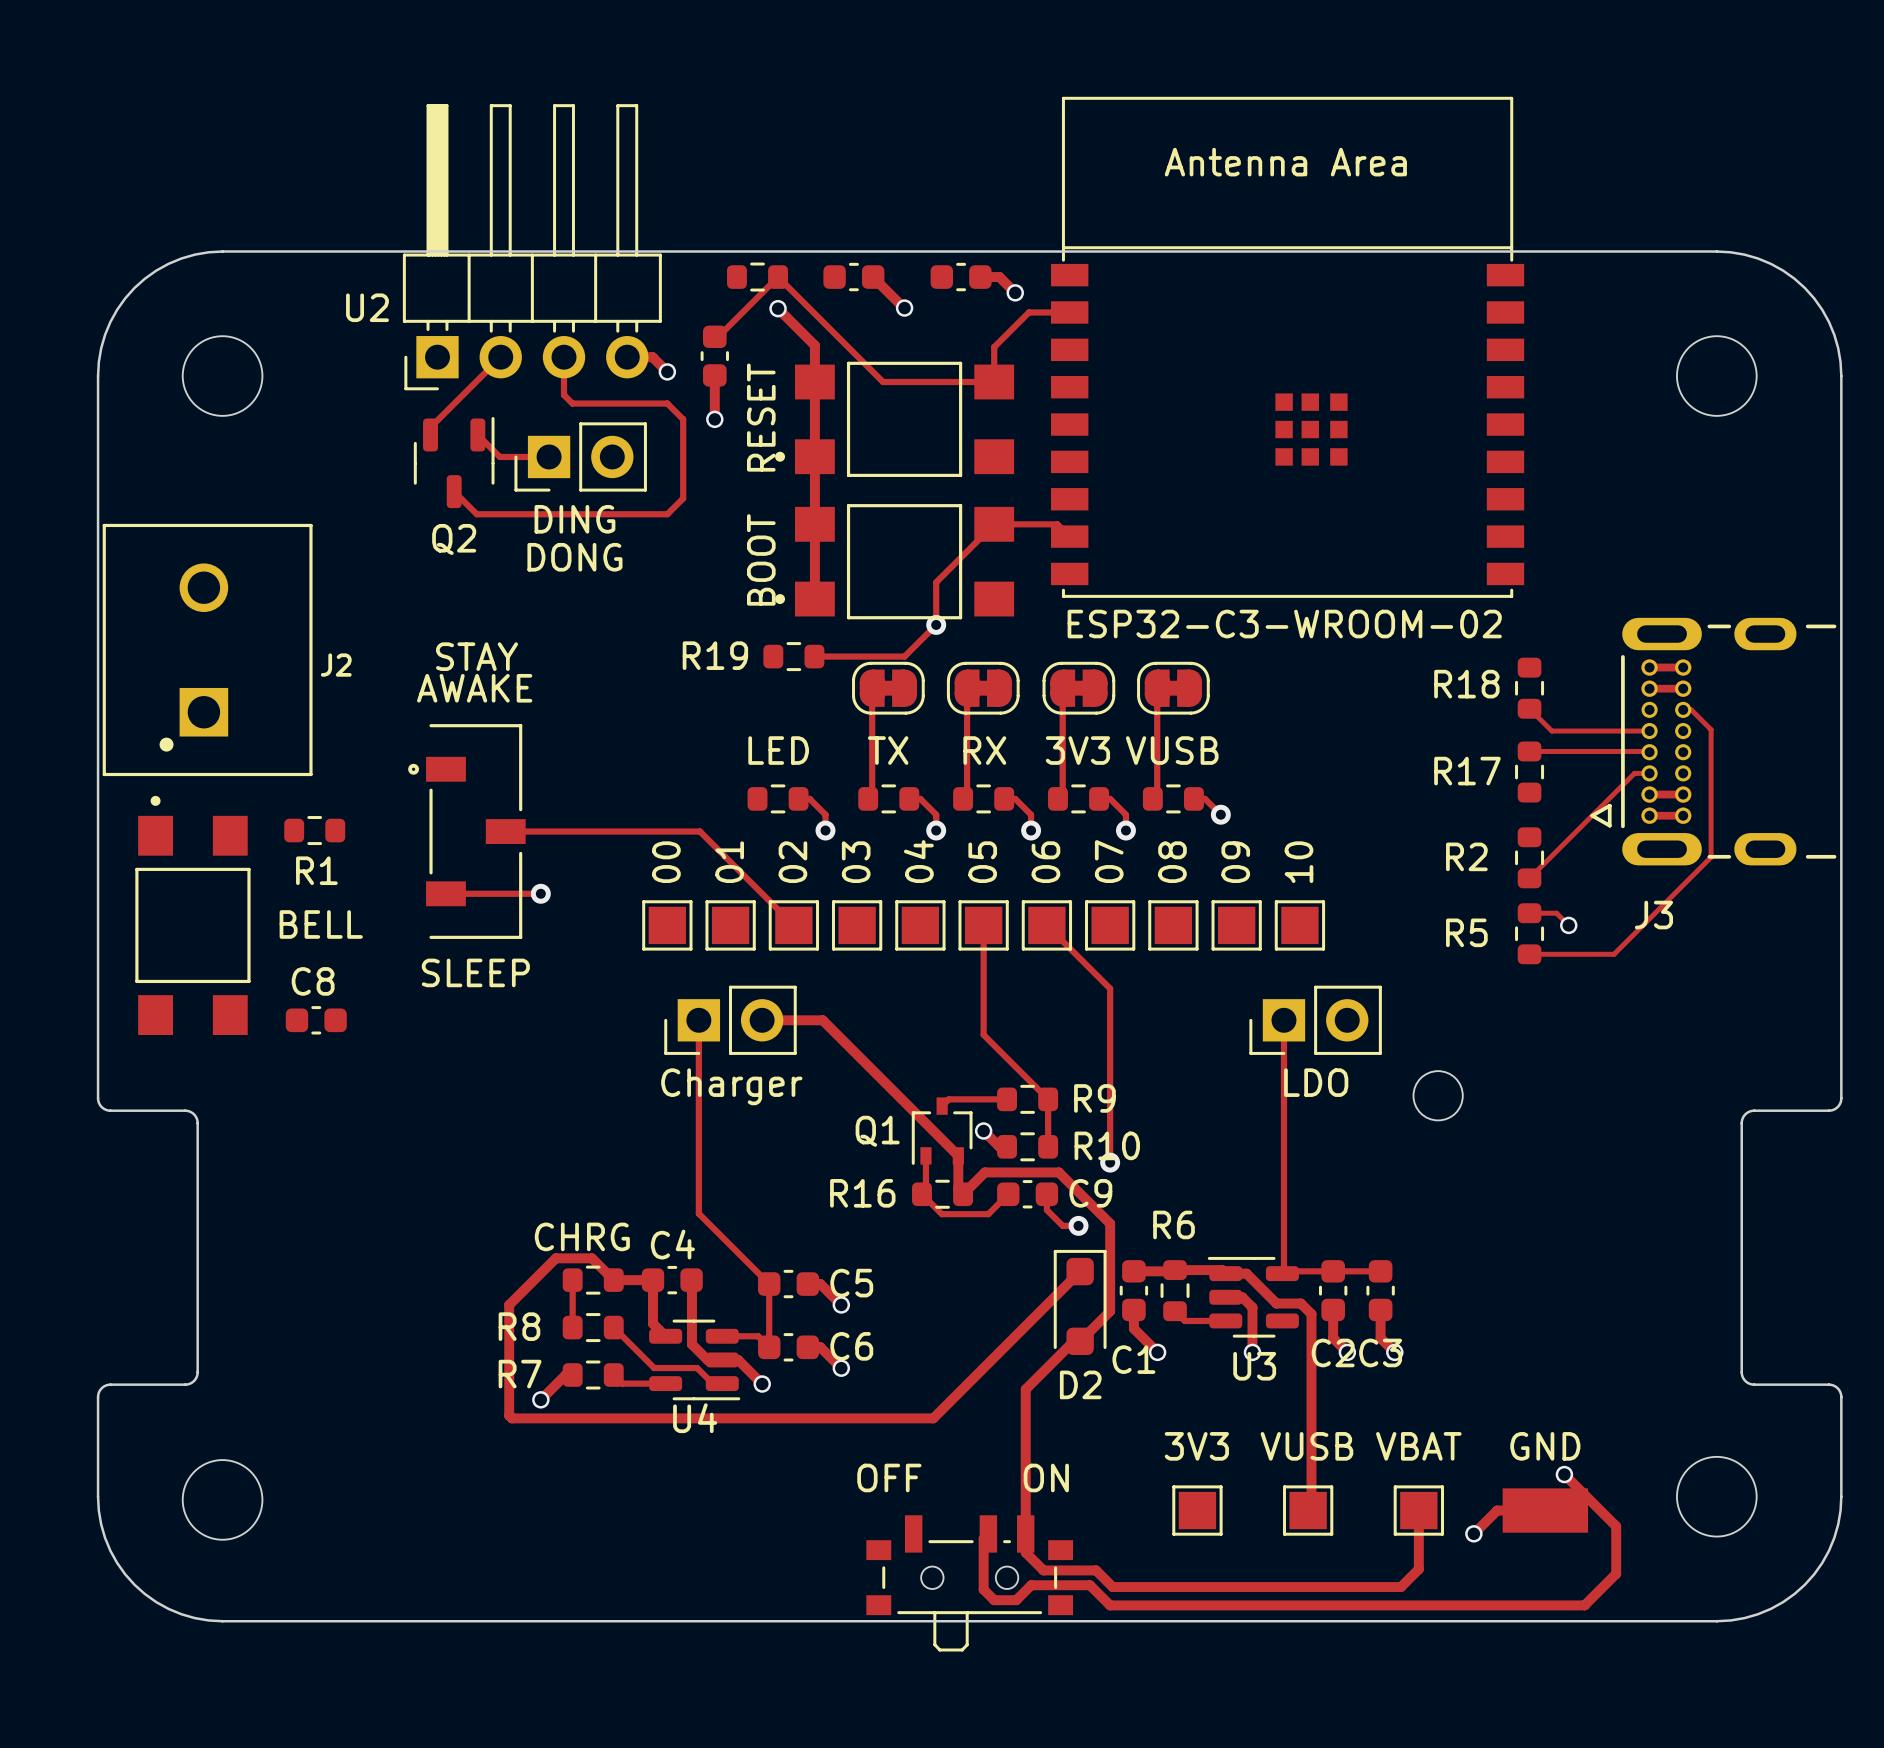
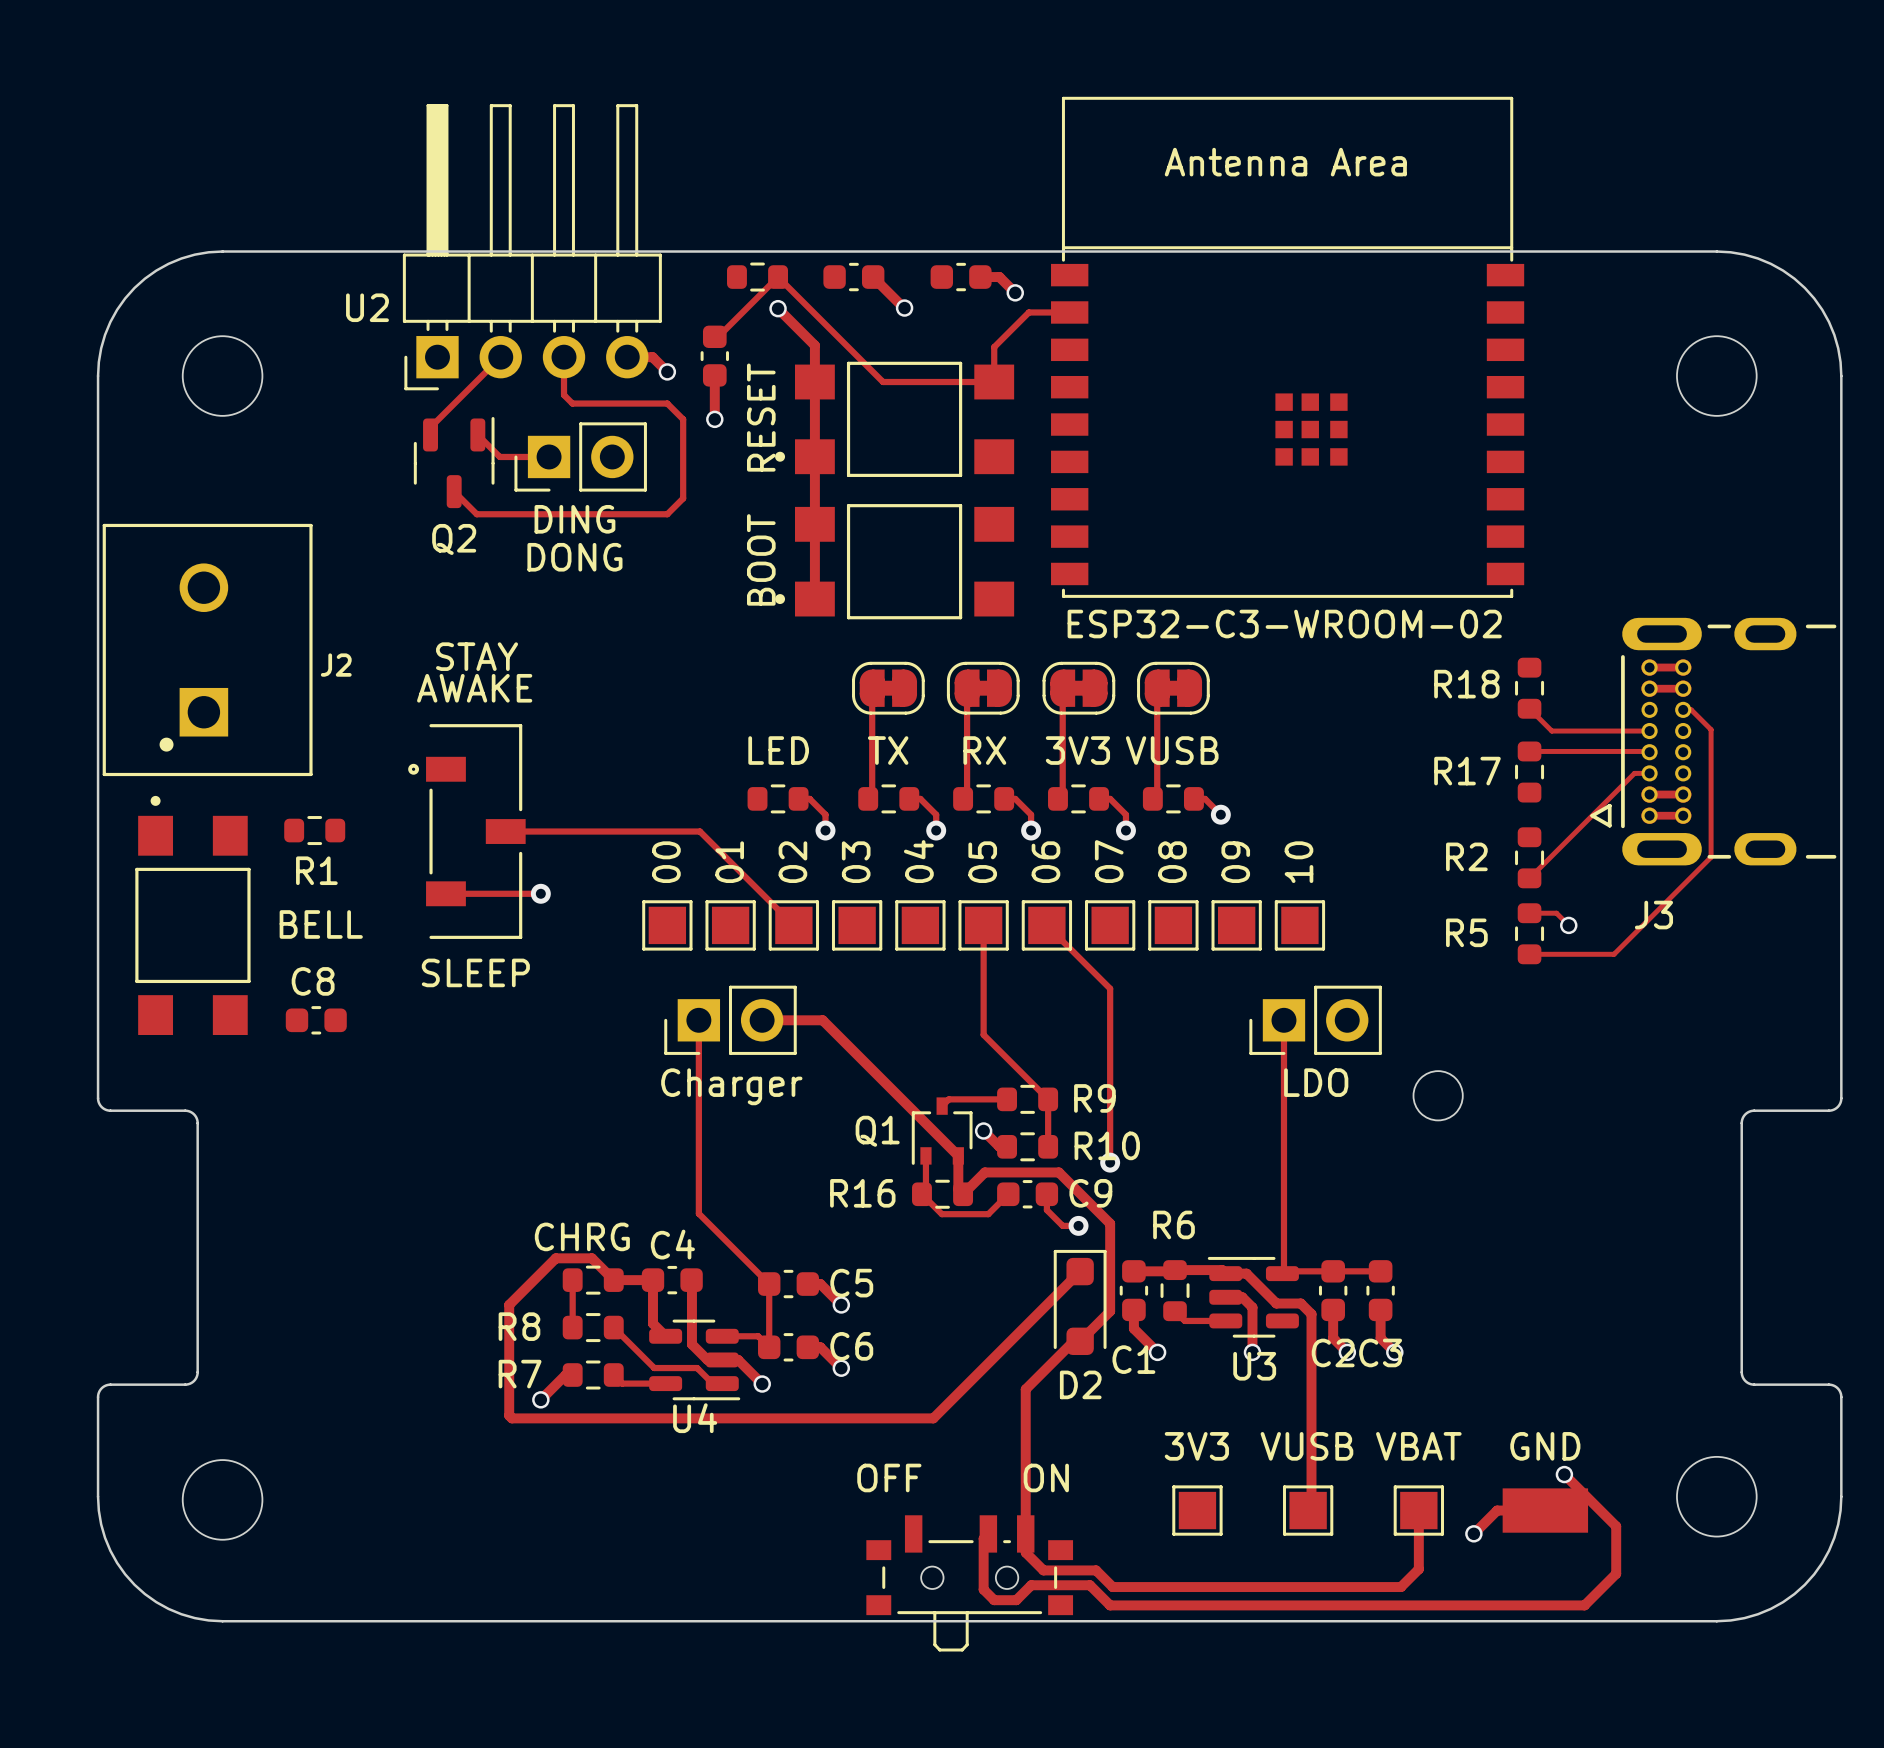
track: (1069, 536) (1057, 524) (994, 524) (936, 582) (936, 624) (904, 656) (814, 656) -> none
via: (936, 624) -> none
R19: (793, 656) -> none

